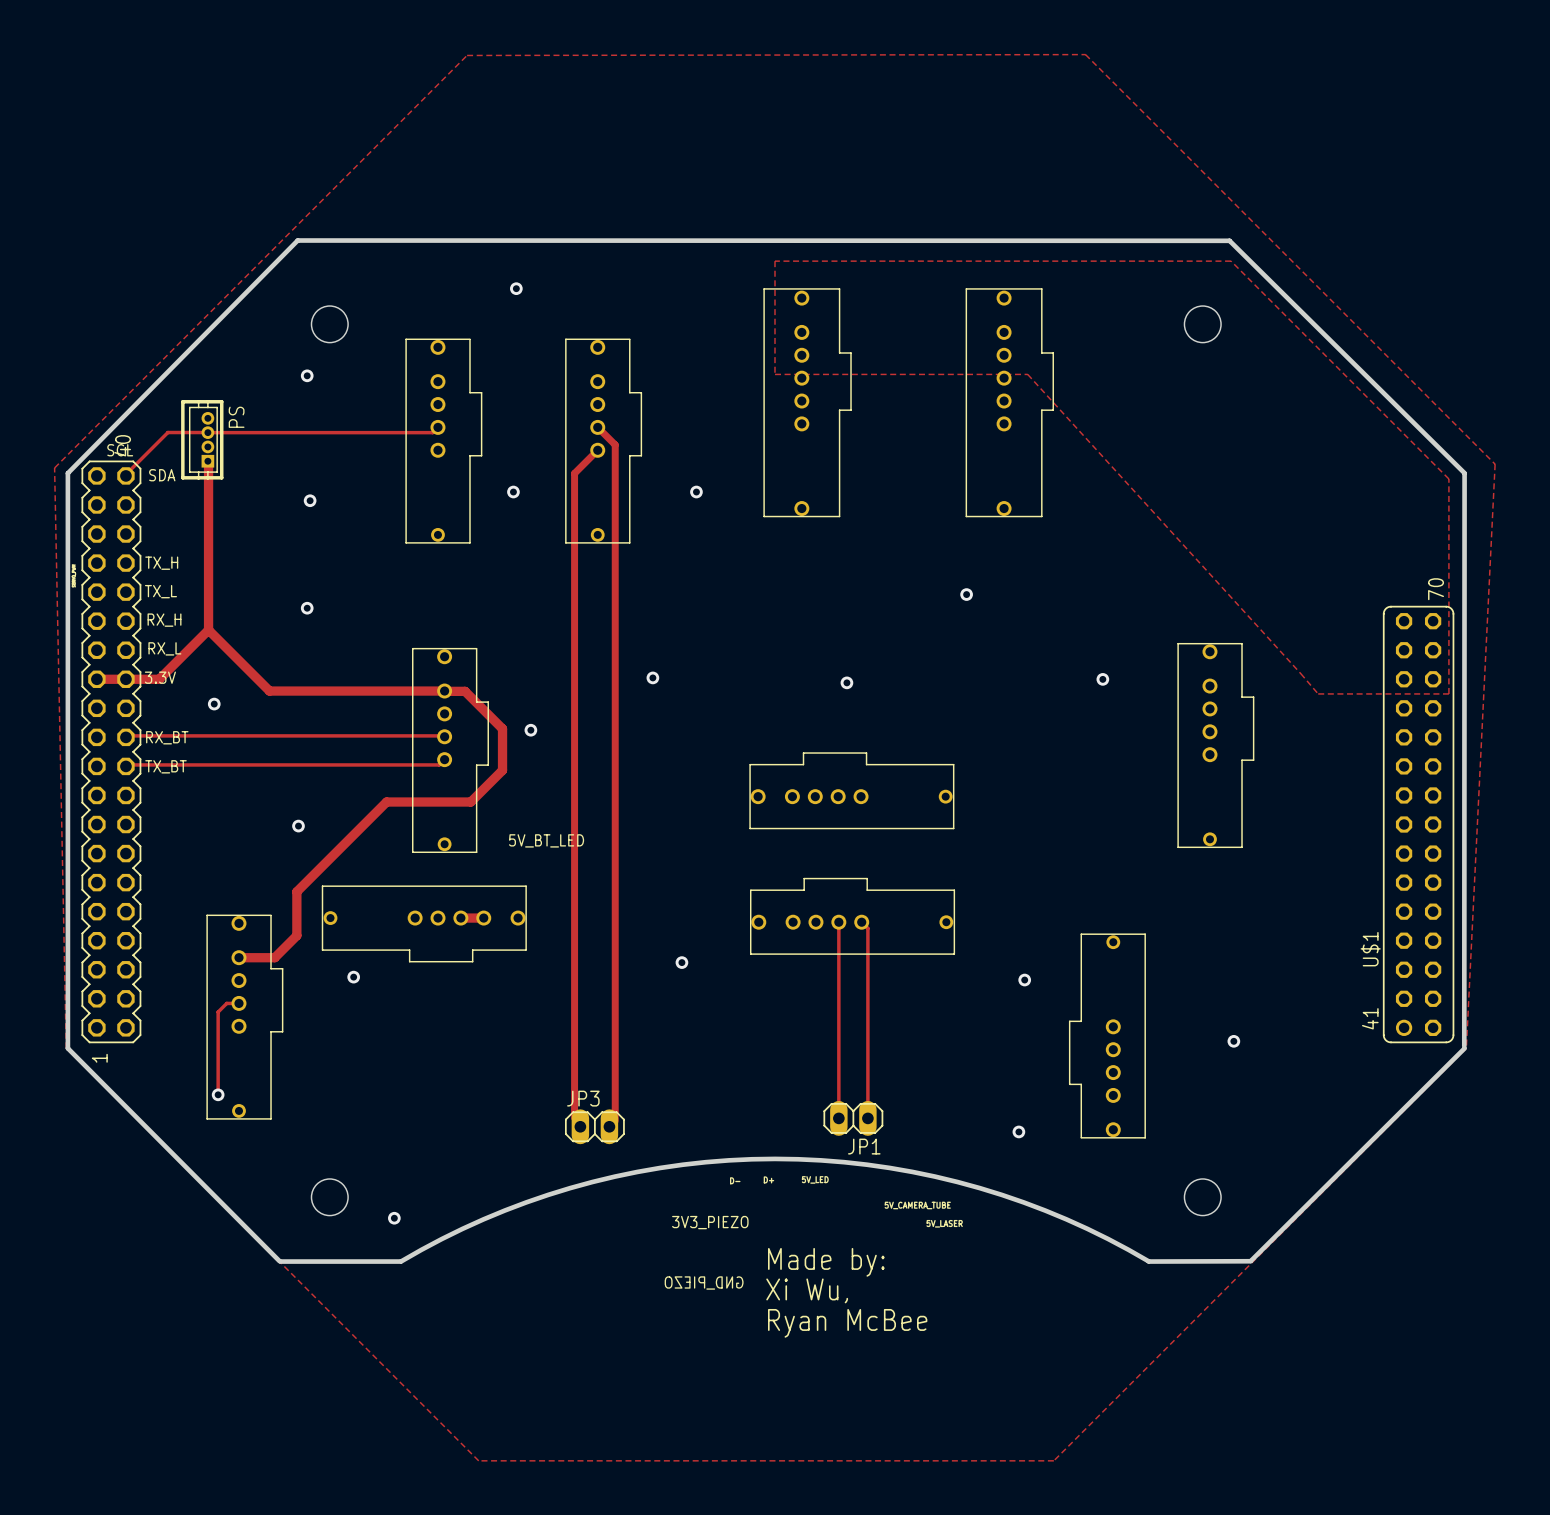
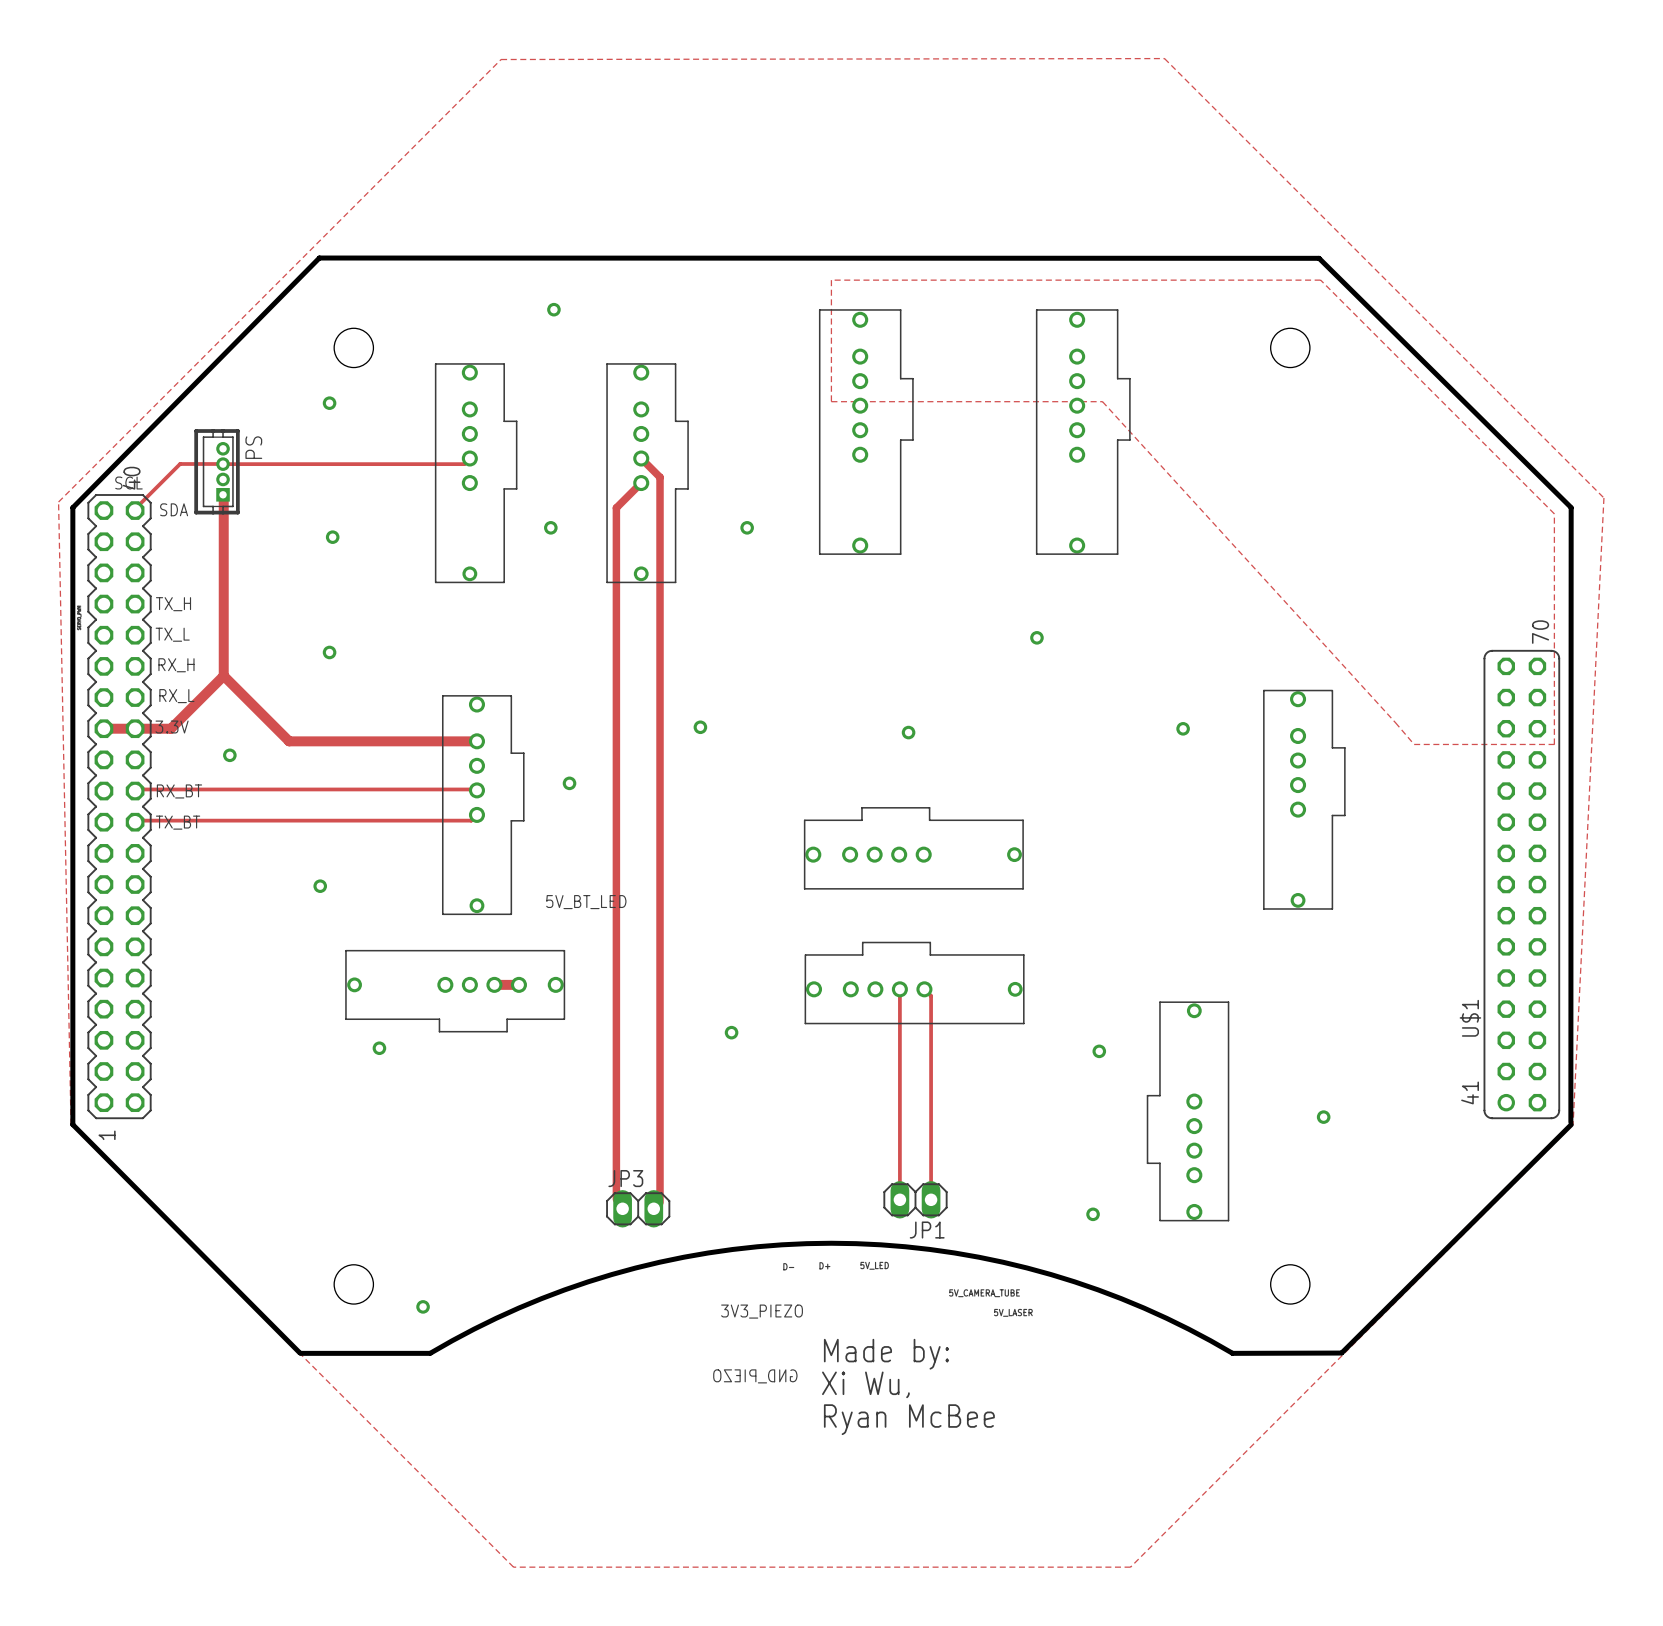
track: (444, 691) (465, 691) (502, 728) (502, 770) (470, 802) (386, 802) (296, 891) (296, 935) (274, 957) (239, 957) -> none
track: (238, 1003) (226, 1003) (218, 1012) (218, 1094) -> none
part: (244, 1017) -> none
via: (218, 1094) -> none

